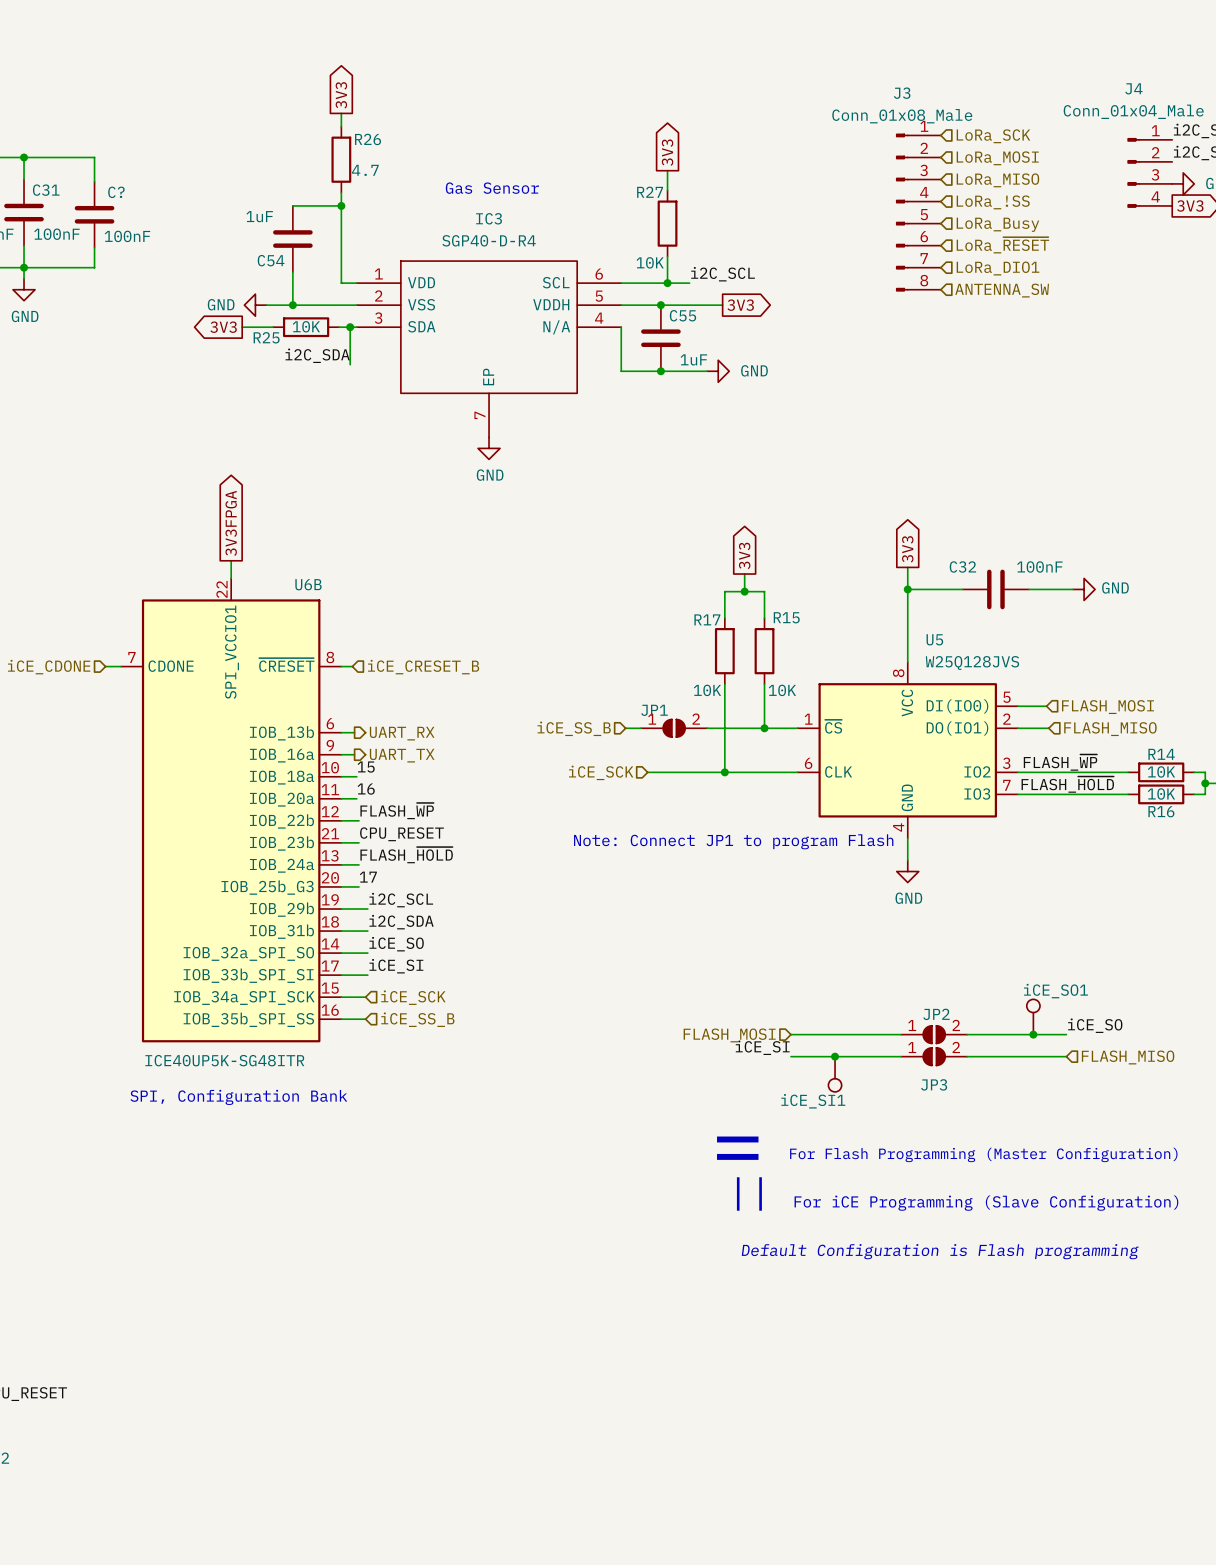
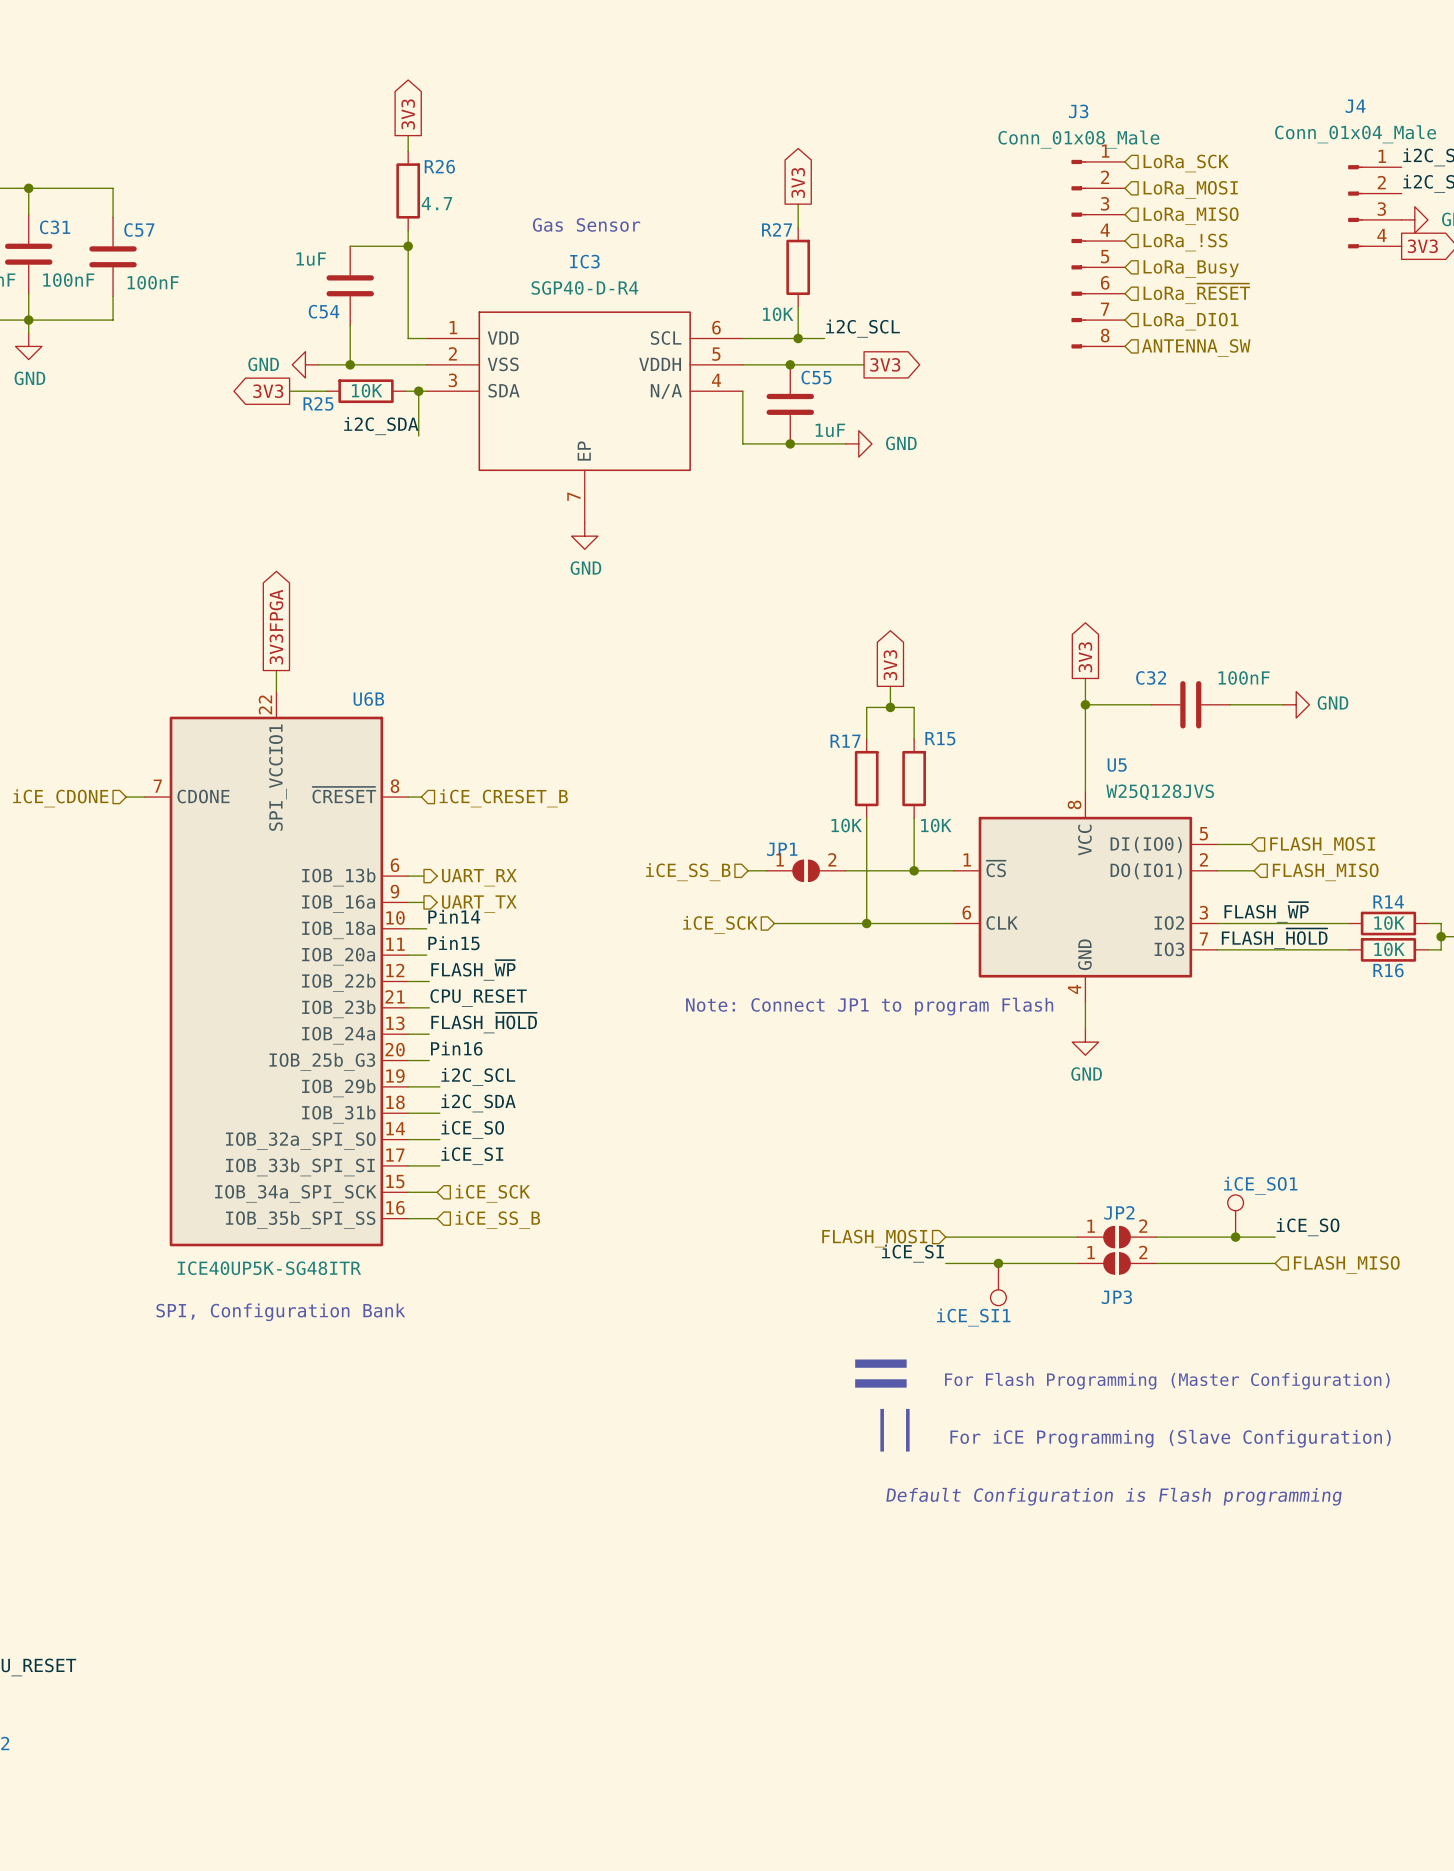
C? name: C? (116, 192) -> C57 (139, 229)
label: 15 (366, 767) -> Pin14 (454, 916)
label: 16 (366, 789) -> Pin15 (453, 943)
label: 17 (368, 877) -> Pin16 (456, 1048)

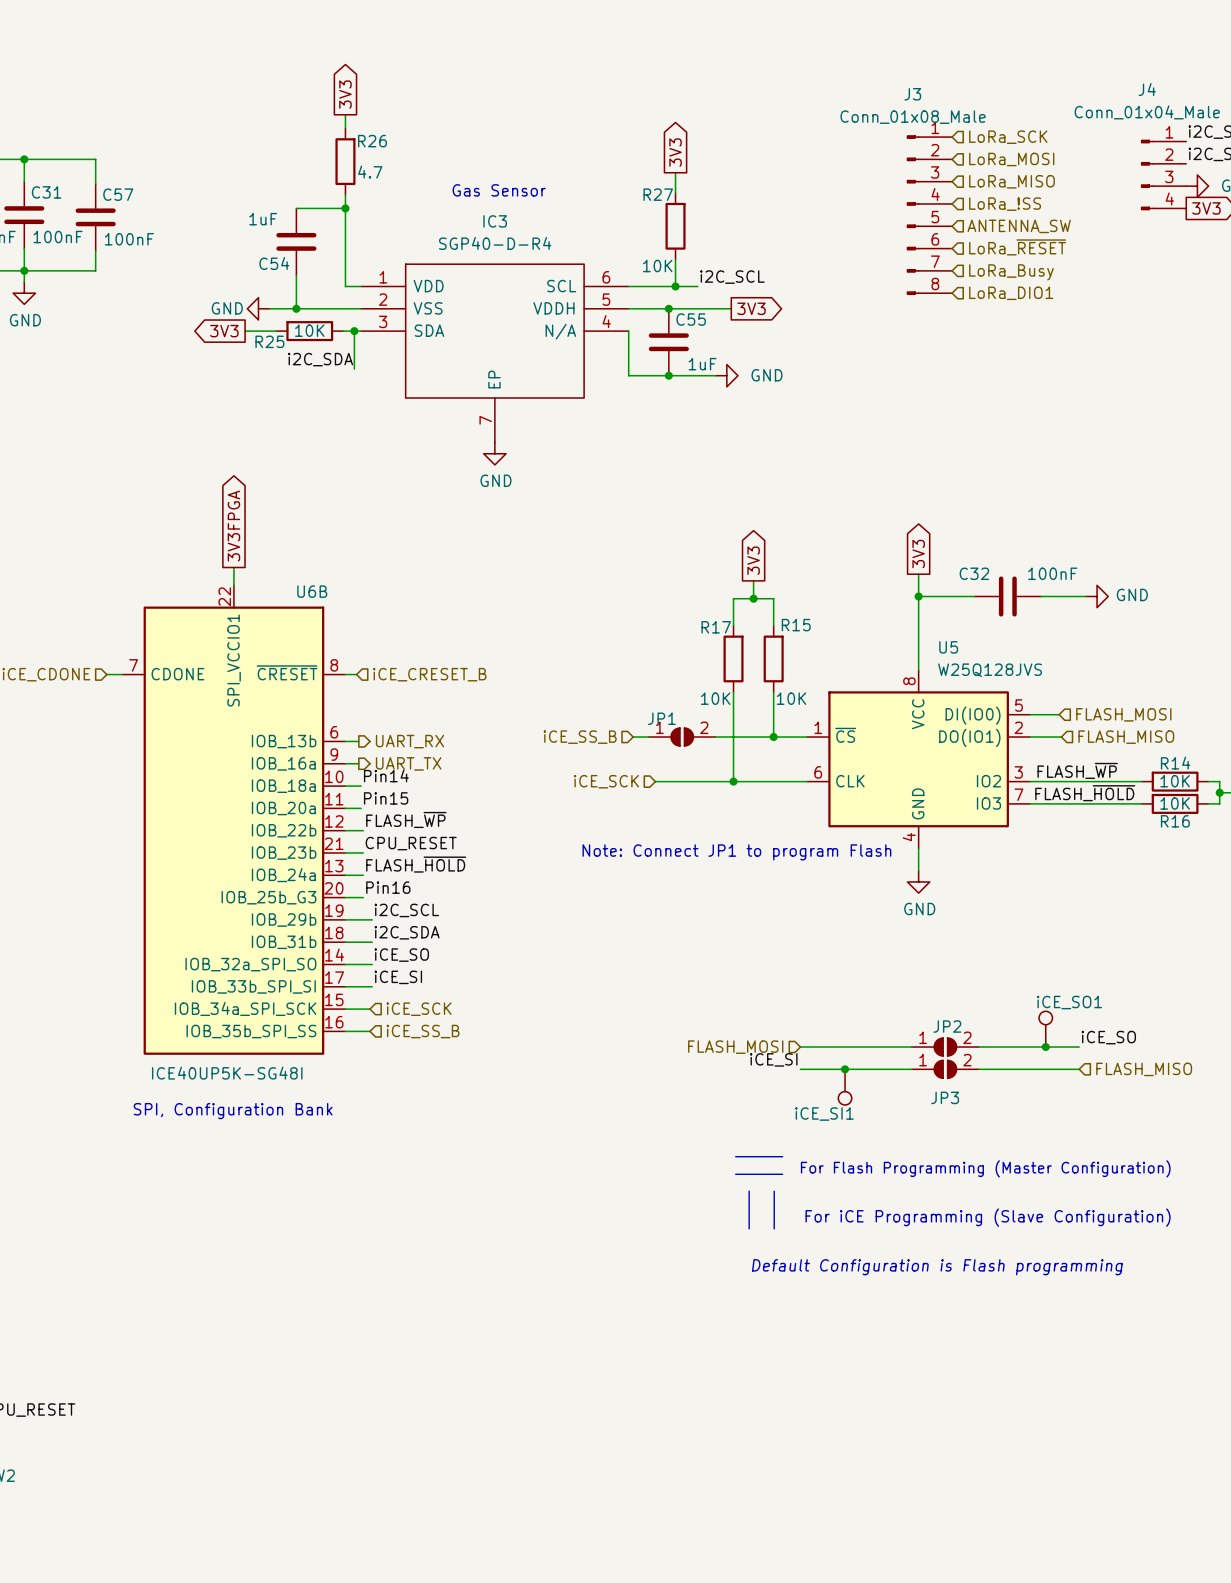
hierarchical label: LoRa_Busy (1191, 269) -> ANTENNA_SW (1019, 226)
hierarchical label: LoRa_DIO1 (1190, 321) -> LoRa_Busy (1011, 272)
hierarchical label: ANTENNA_SW (1196, 347) -> LoRa_DIO1 (1011, 293)
U6B value: ICE40UP5K-SG48ITR (269, 1268) -> ICE40UP5K-SG48I (227, 1073)

